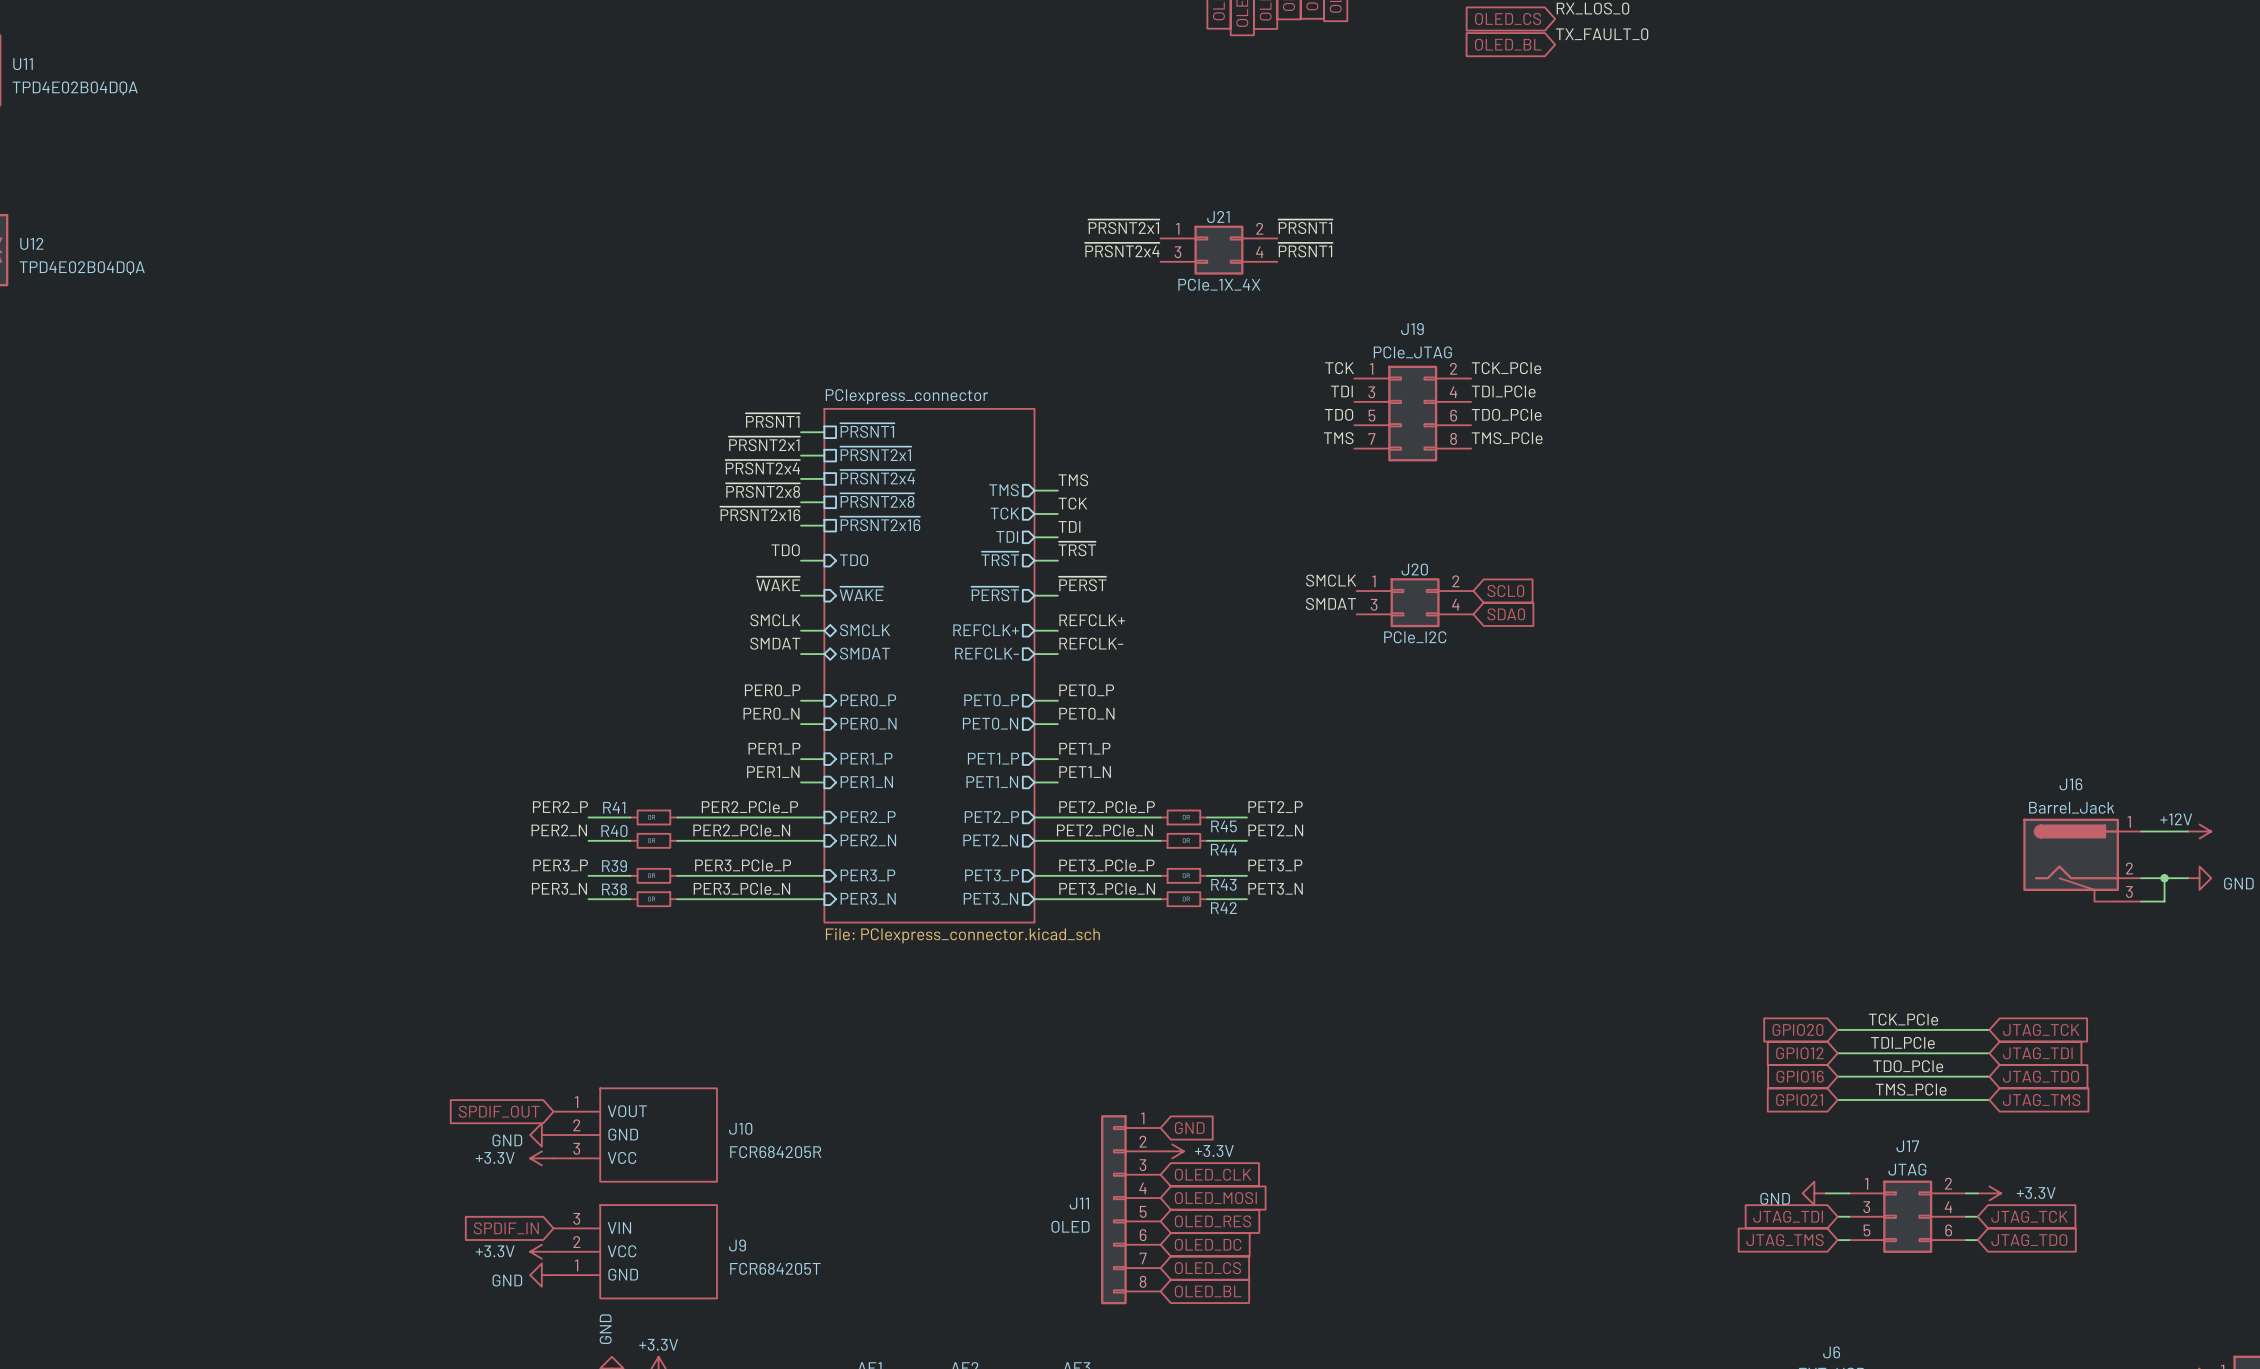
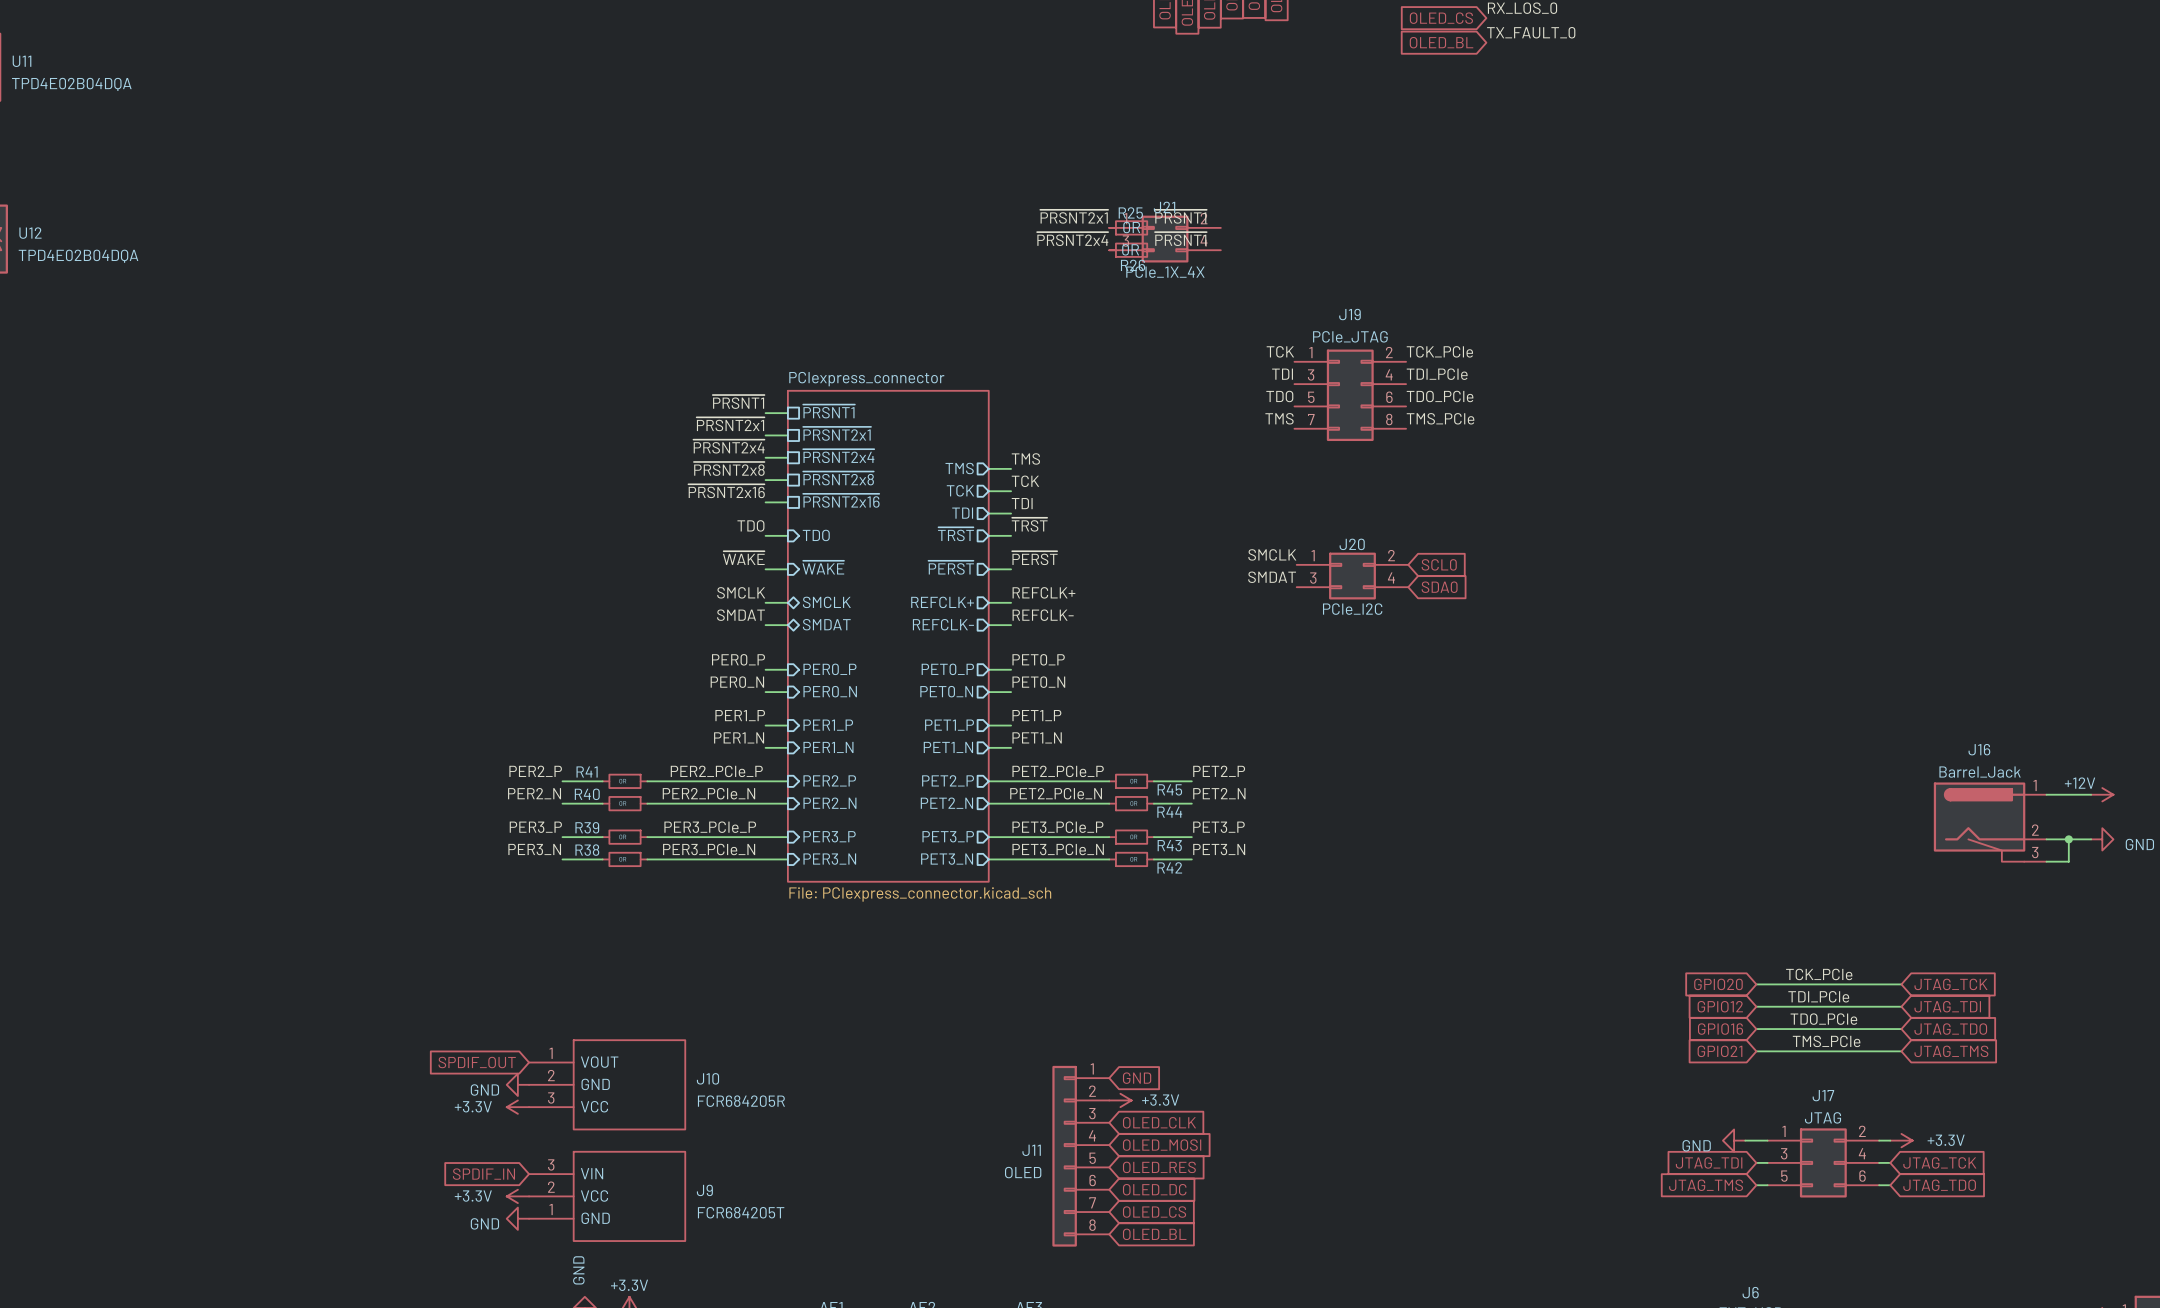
label: none -> ~{PRSNT1} (1180, 216)
label: ~{PRSNT1} (1305, 226) -> none
R25: none -> 0R (1131, 227)
label: none -> ~{PRSNT1} (1180, 239)
label: ~{PRSNT1} (1305, 250) -> none
R26: none -> 0R (1131, 250)

